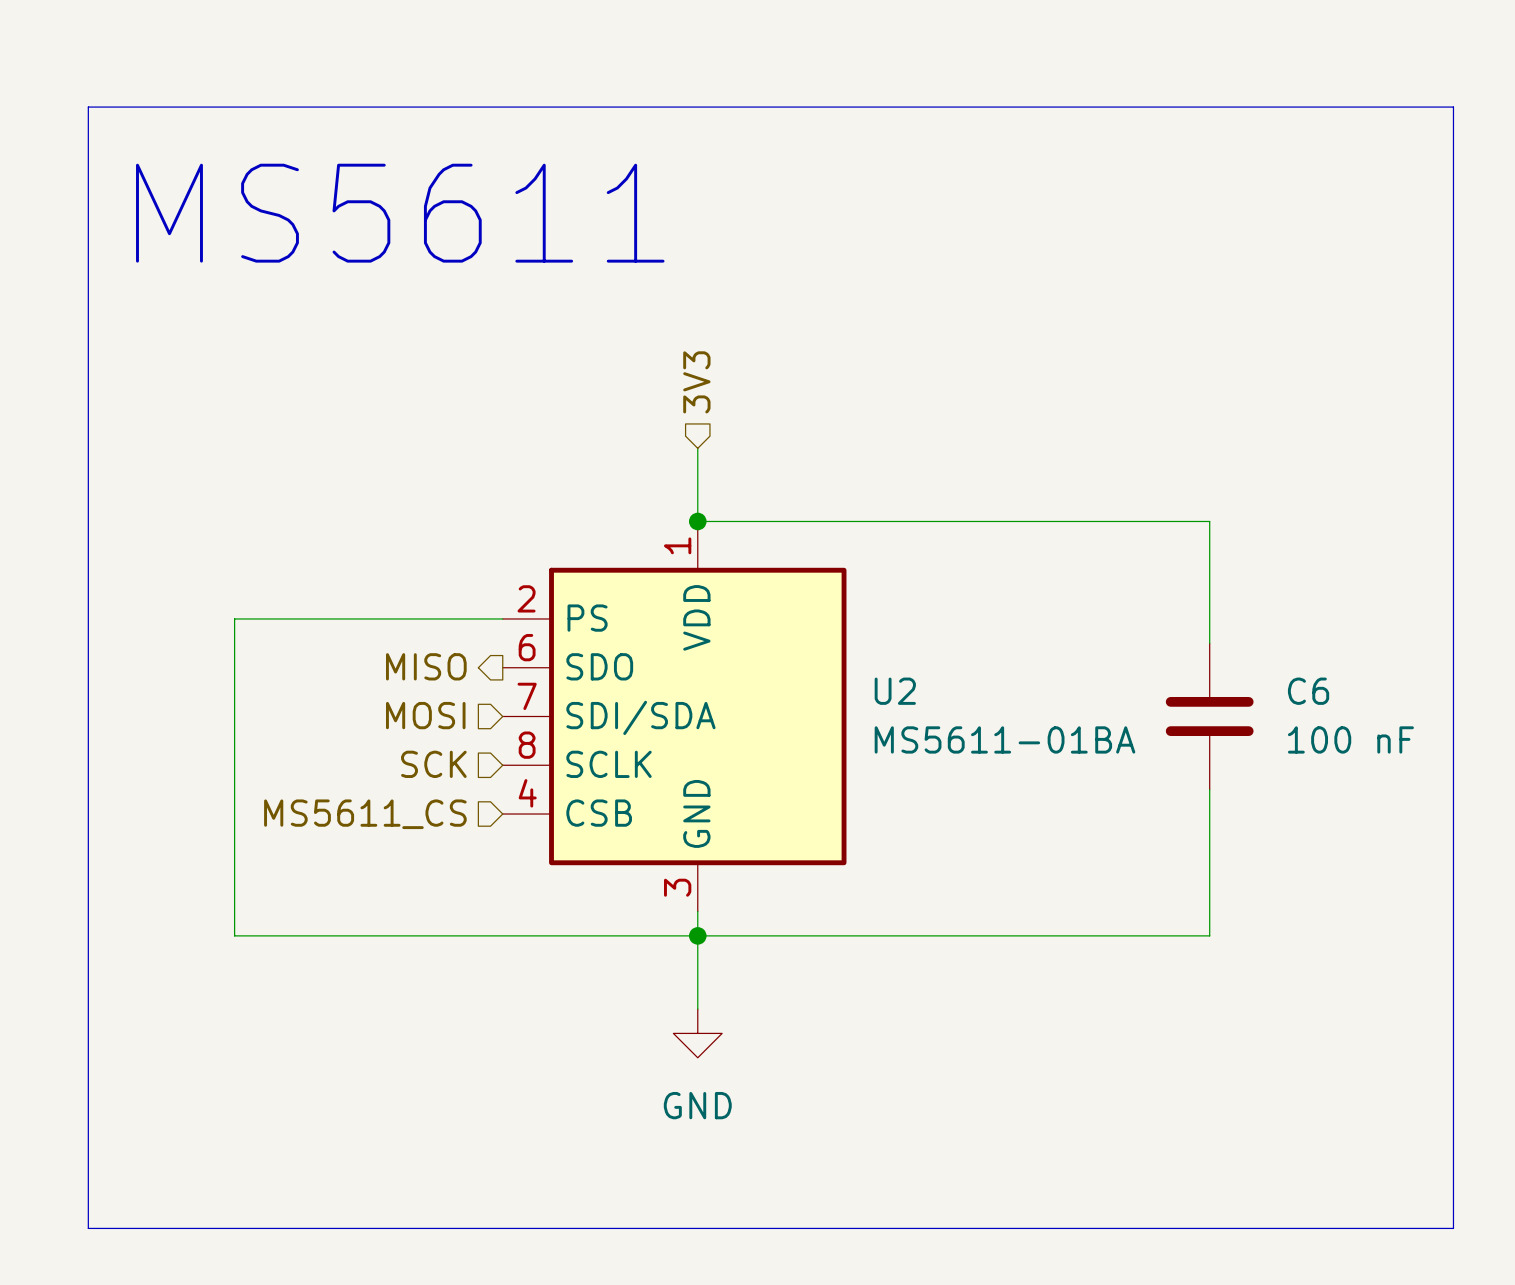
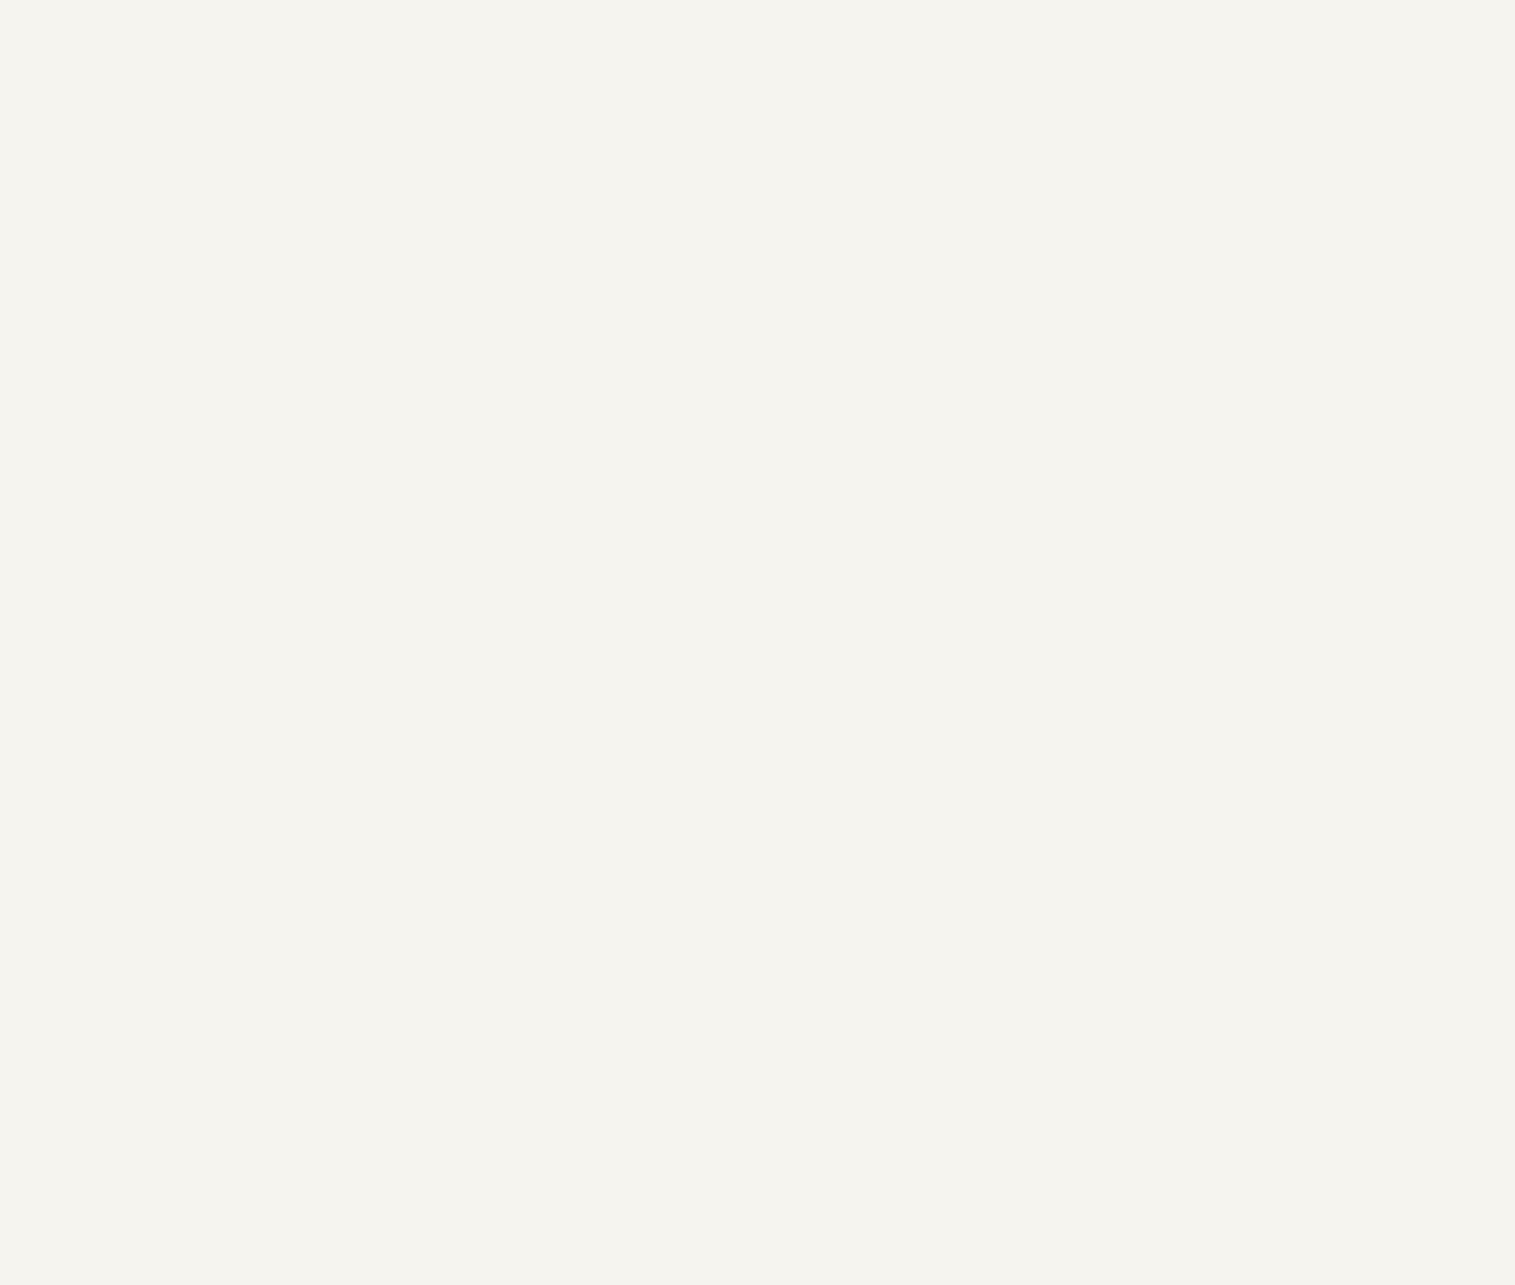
line: (88, 107) (88, 1228) (1453, 1228) (1453, 107) (88, 107) -> none
text: MS5611 (400, 213) -> none
hierarchical label: 3V3 (696, 382) -> none
wire: (697, 448) (697, 521) (1209, 521) (1209, 643) -> none
junction: (697, 521) -> none
wire: (502, 618) (234, 618) (234, 935) (1209, 935) (1209, 789) -> none
hierarchical label: MISO (426, 666) -> none
hierarchical label: MOSI (425, 715) -> none
U2: MS5611-01BA (674, 716) -> none
C6: 100 nF (1209, 716) -> none
hierarchical label: SCK (433, 764) -> none
hierarchical label: MS5611_CS (365, 814) -> none
wire: (697, 911) (697, 1009) -> none
junction: (697, 935) -> none
power symbol: GND (697, 1033) -> none

